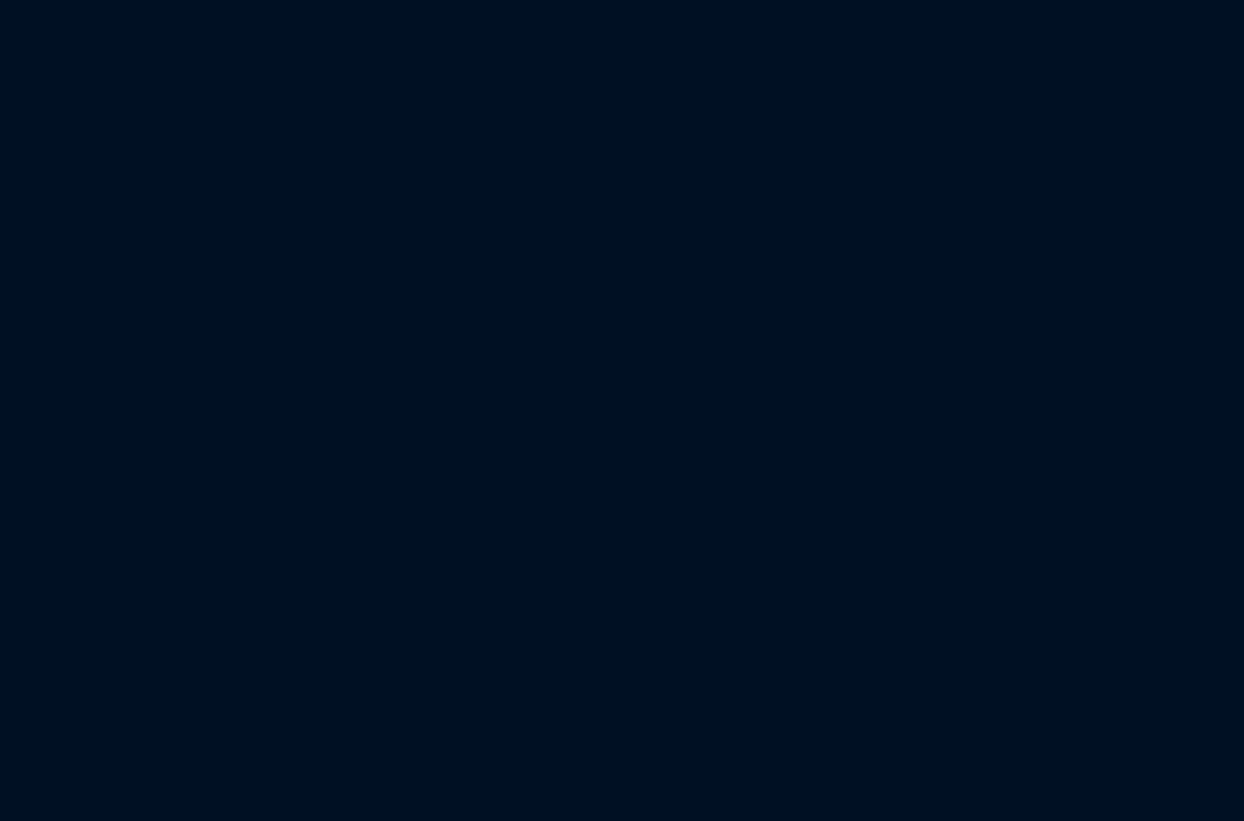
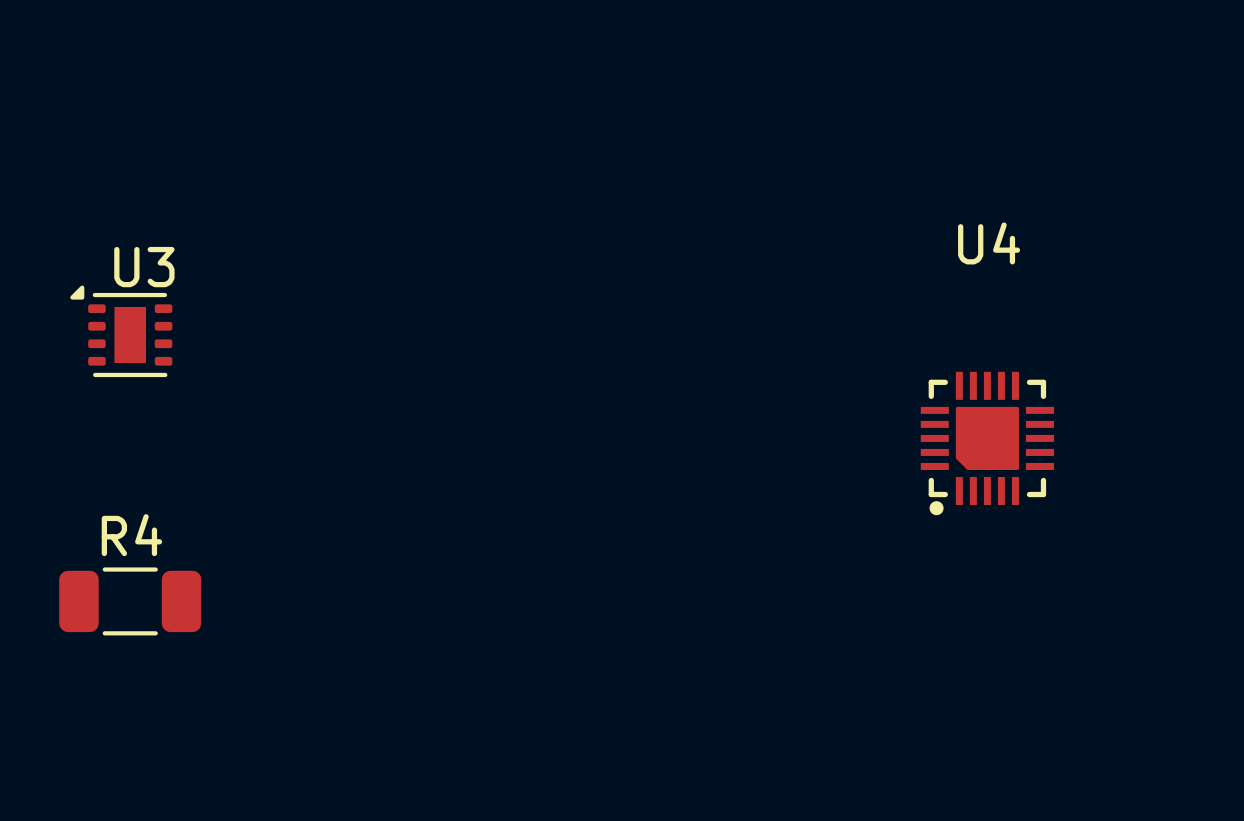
U3: none -> (121, 331)
U4: none -> (987, 443)
R4: none -> (130, 601)

